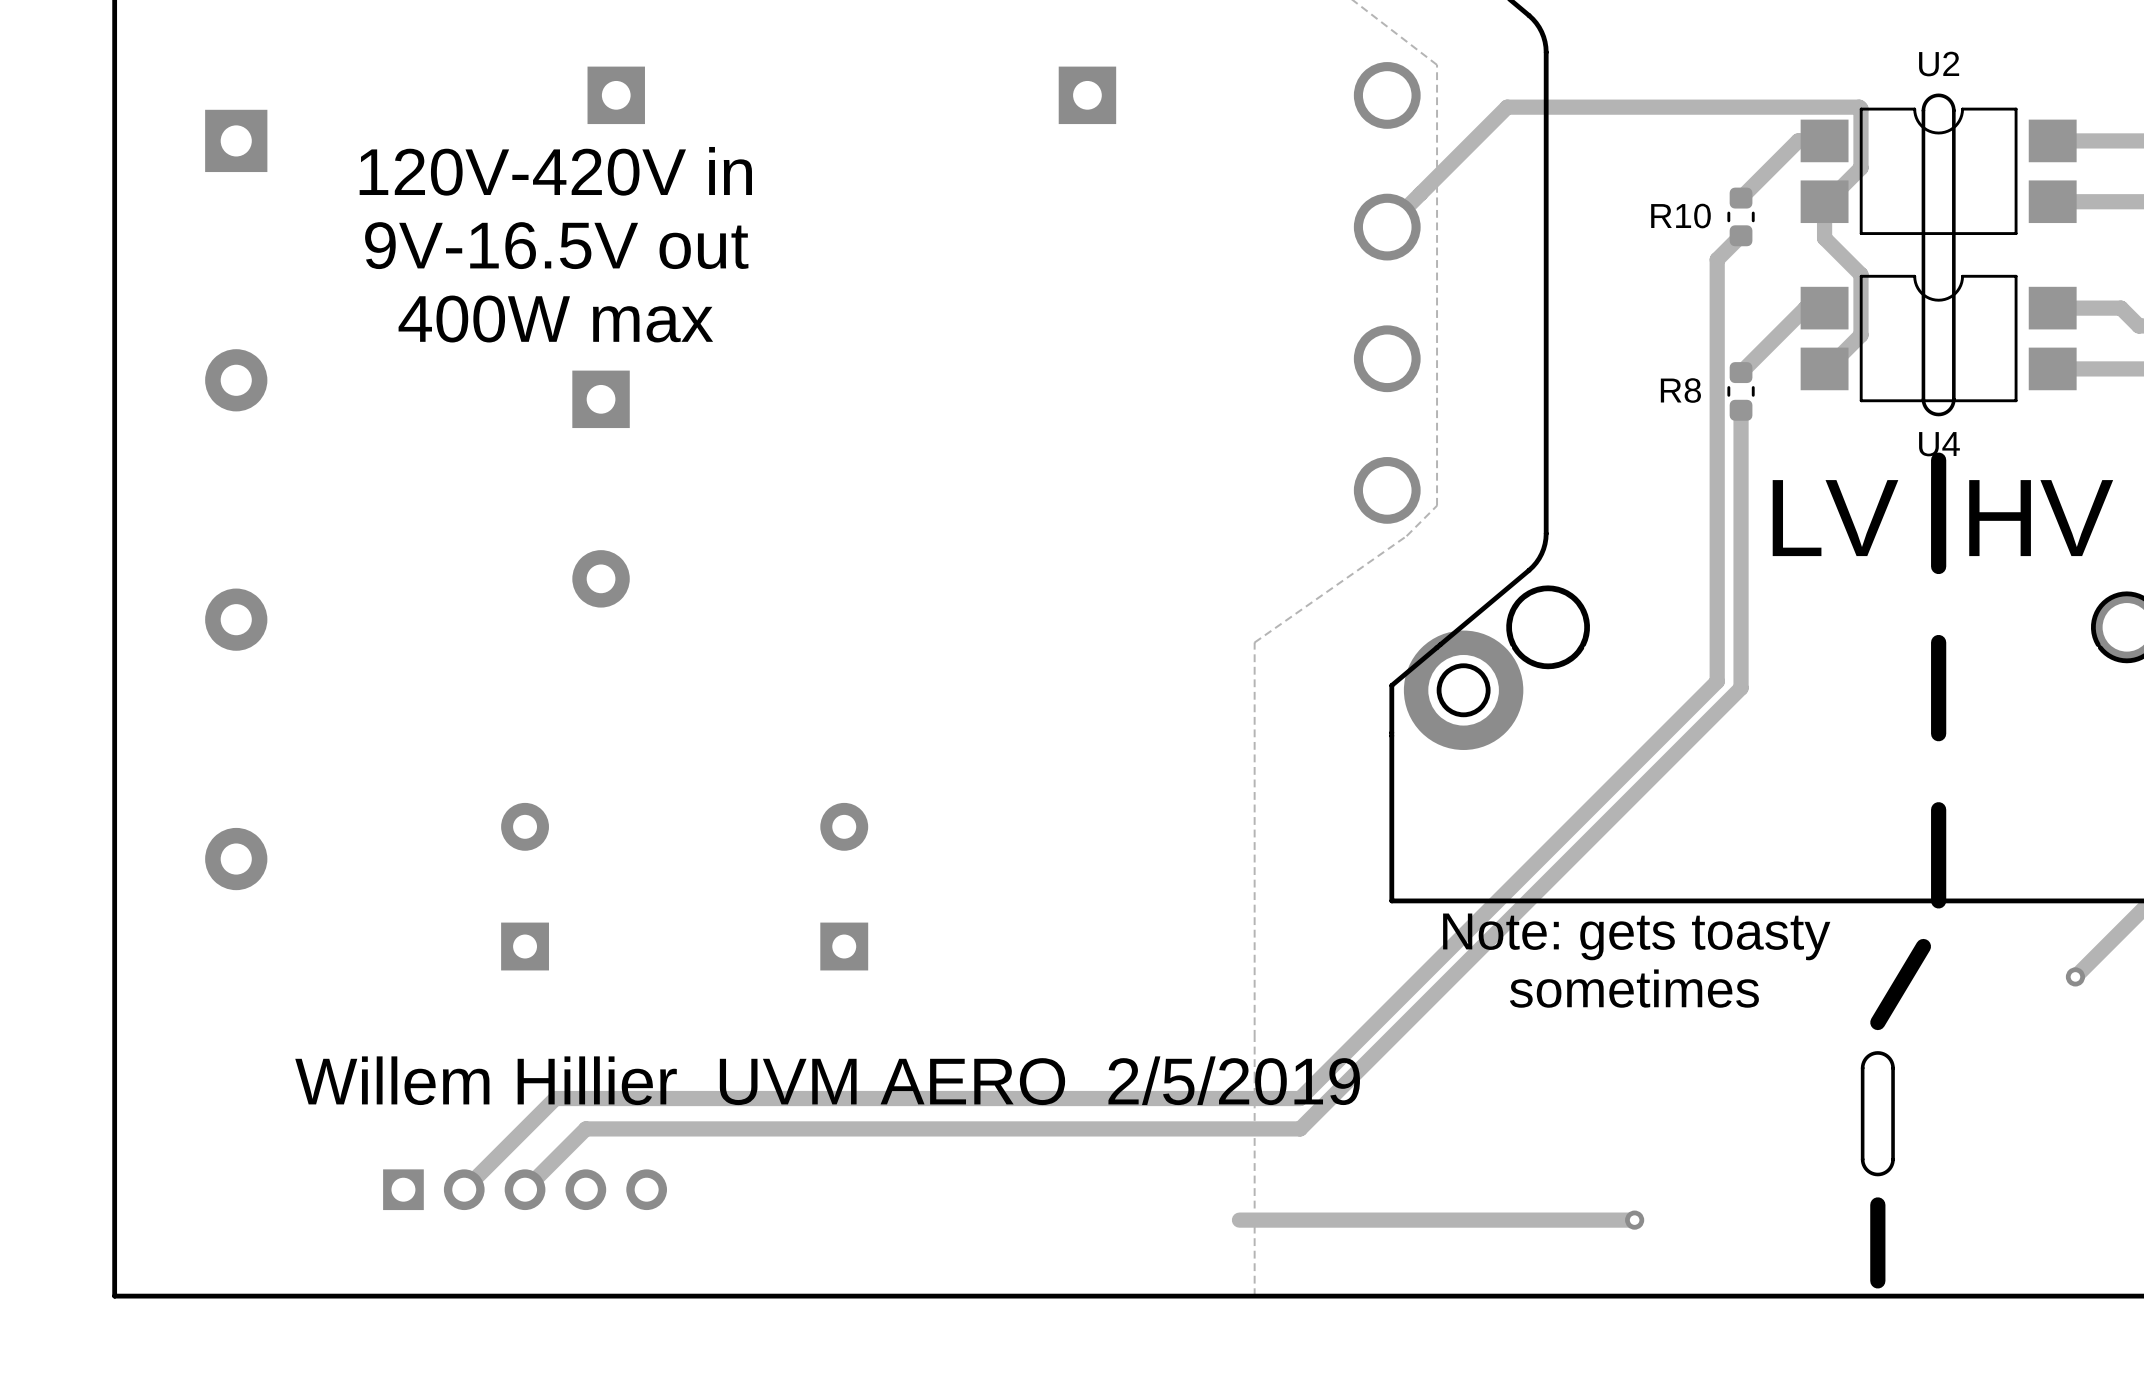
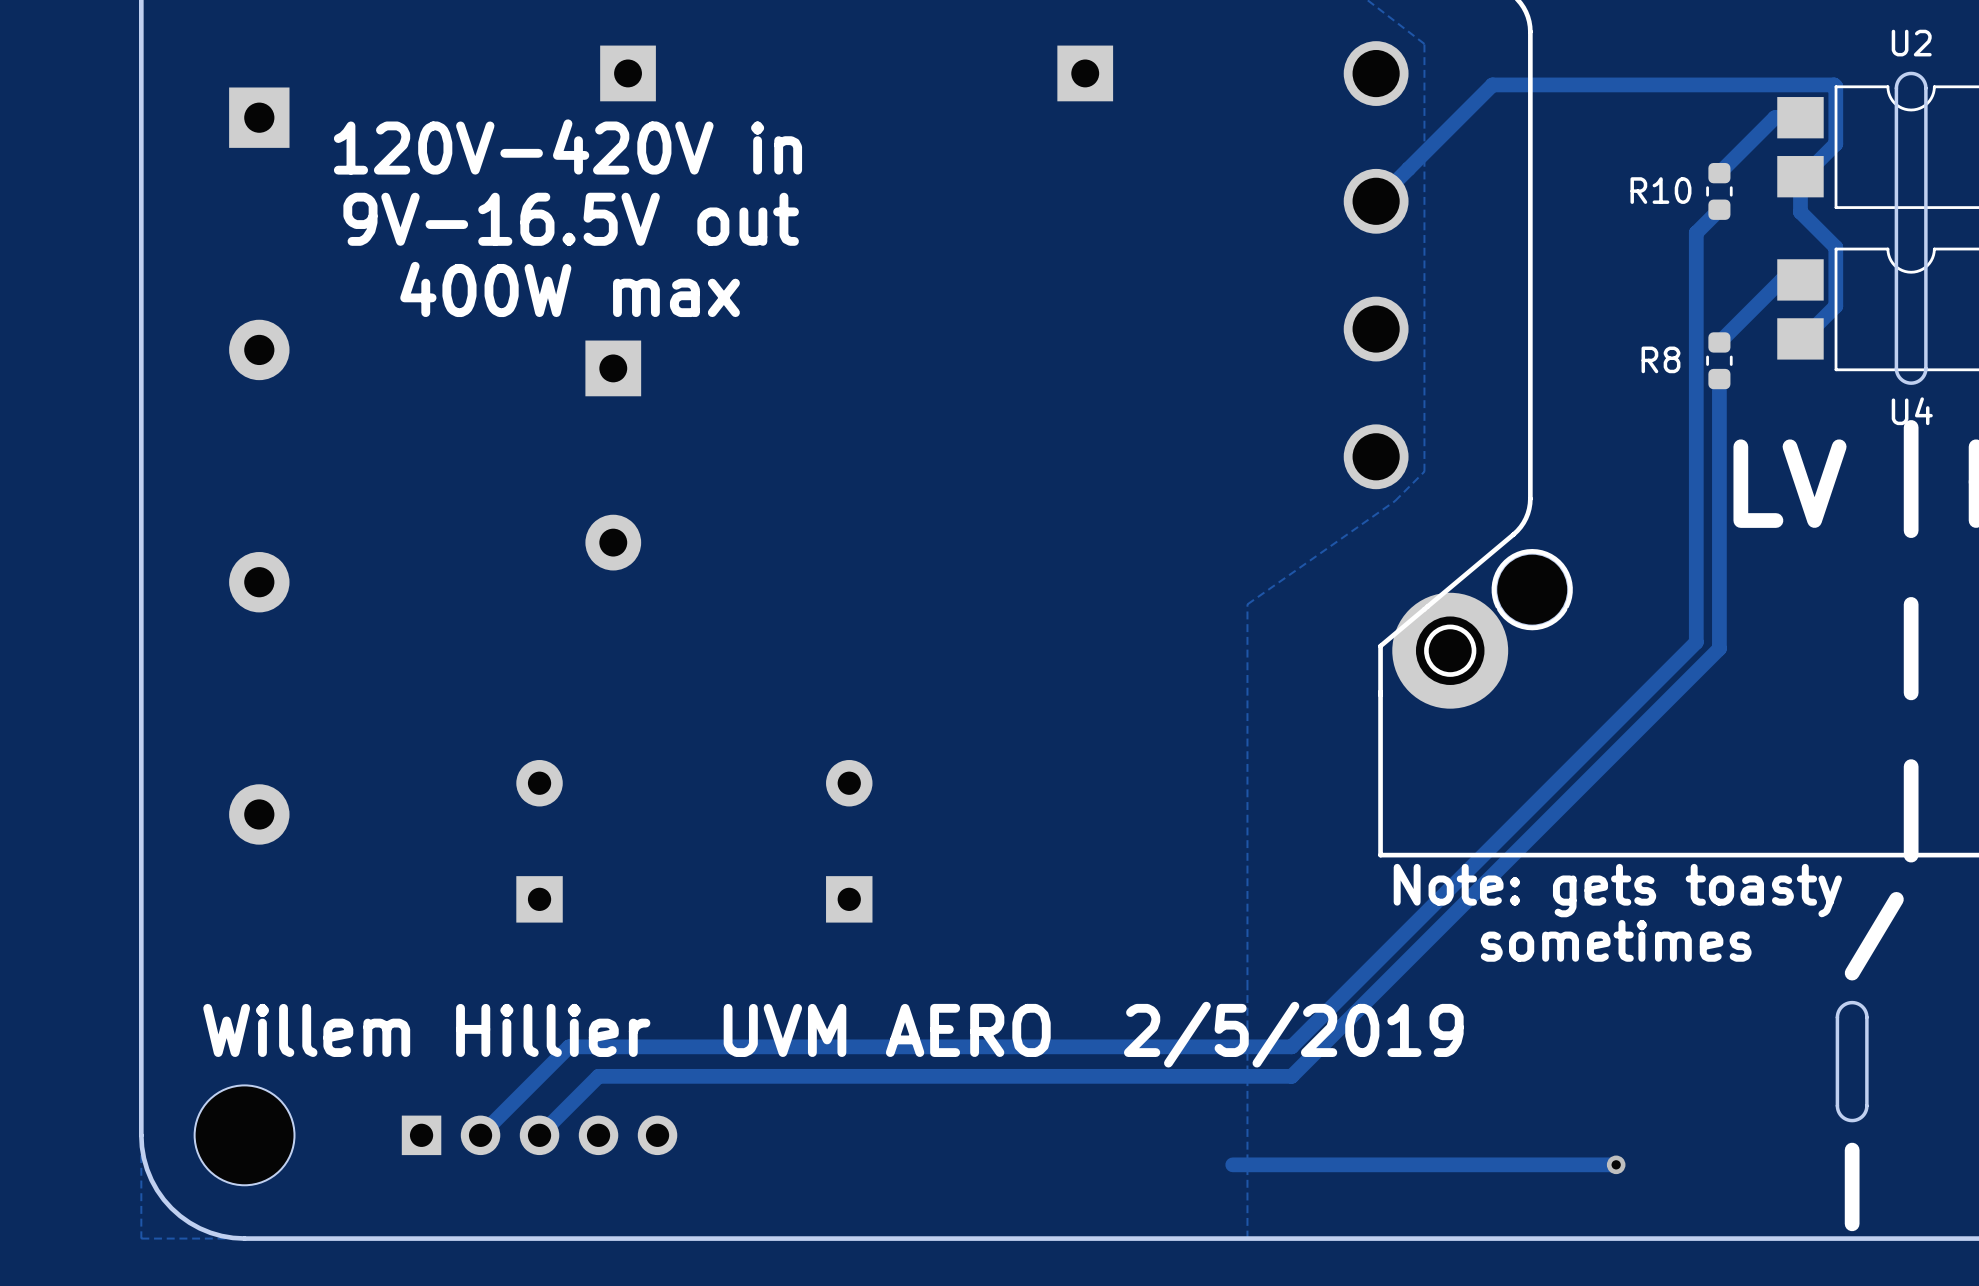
board edge: (114, 1189) (114, 1296) (221, 1296) -> (141, 1135) (143, 1158) (151, 1180) (171, 1208) (199, 1228) (221, 1235) (244, 1238)
part: none -> (244, 1135)

